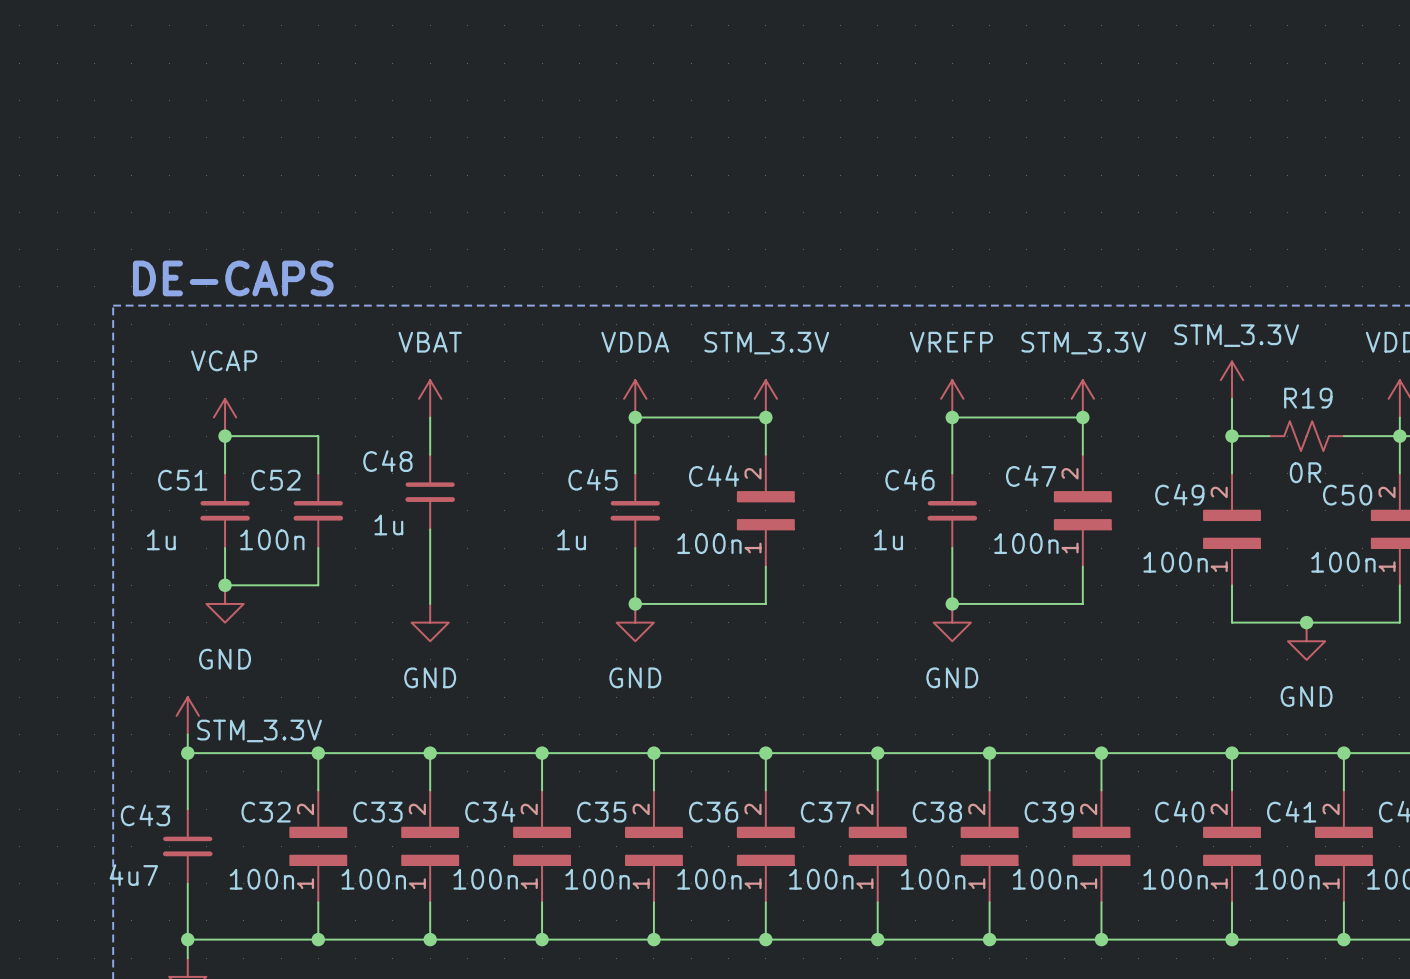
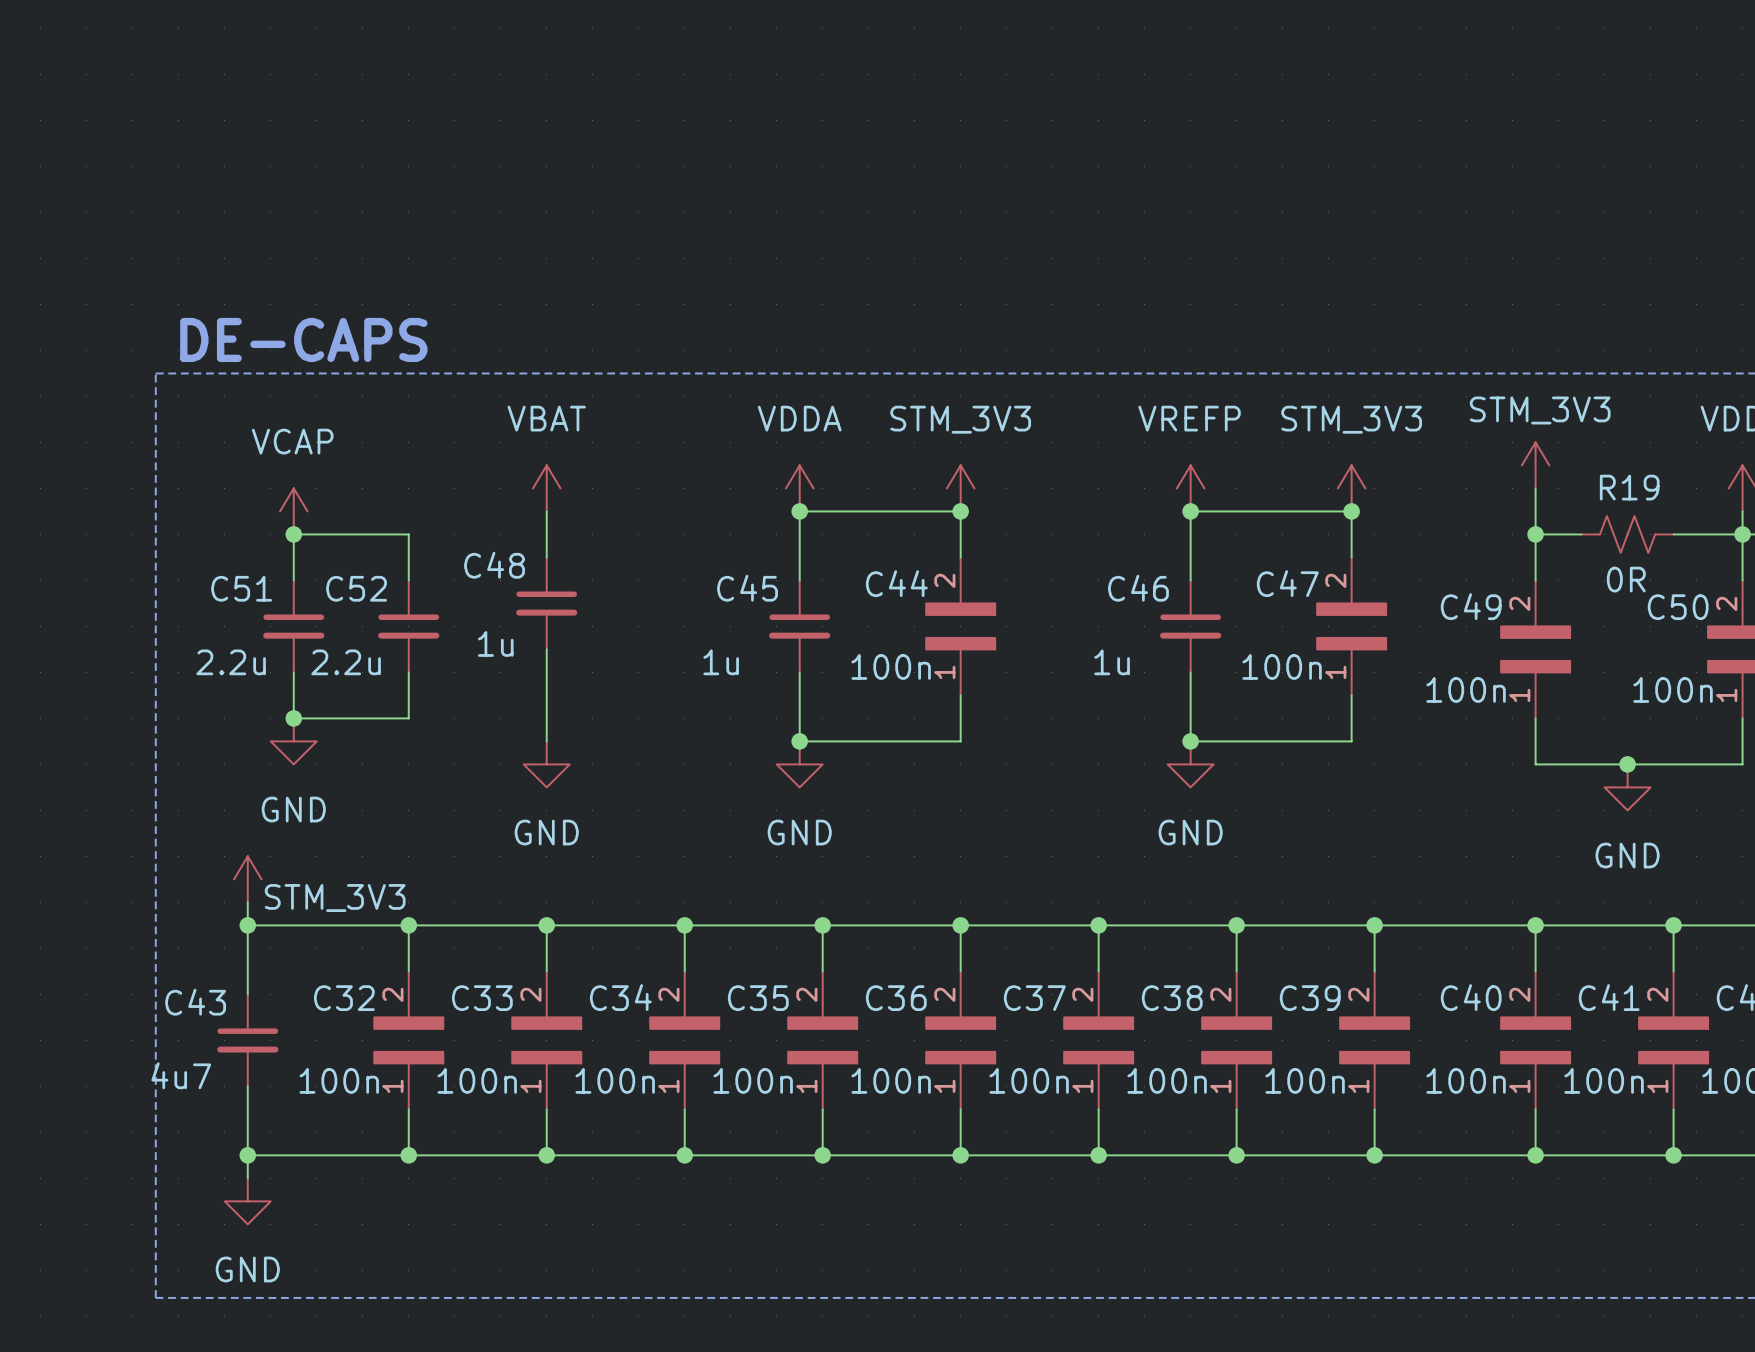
power symbol: STM_3.3V (1232, 380) -> STM_3V3 (1535, 465)
power symbol: STM_3.3V (765, 398) -> STM_3V3 (960, 488)
power symbol: STM_3.3V (1082, 398) -> STM_3V3 (1351, 488)
C51 value: 1u (161, 539) -> 2.2u (231, 662)
C52 value: 100n (272, 539) -> 2.2u (346, 662)
power symbol: STM_3.3V (187, 715) -> STM_3V3 (247, 879)

